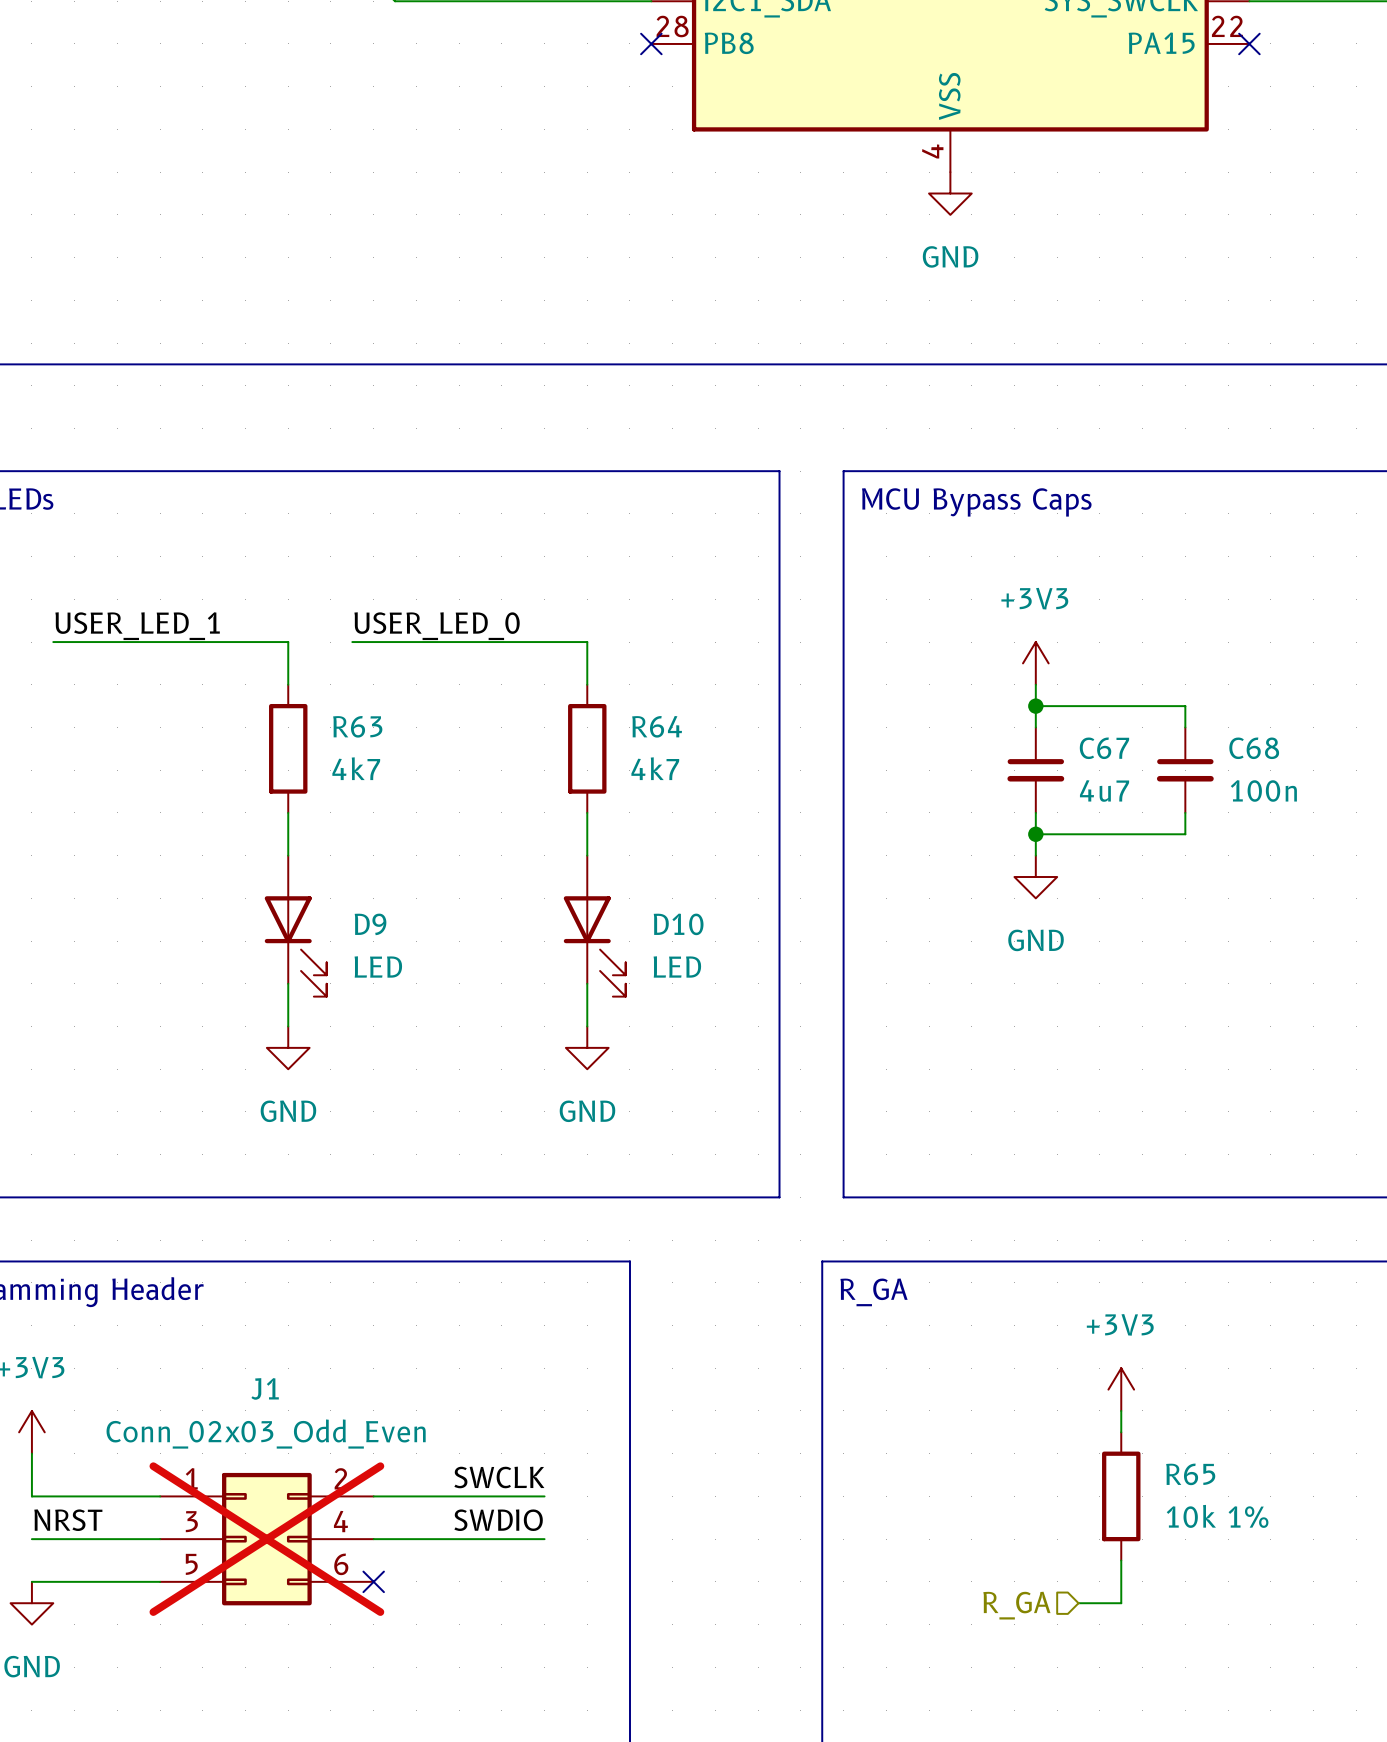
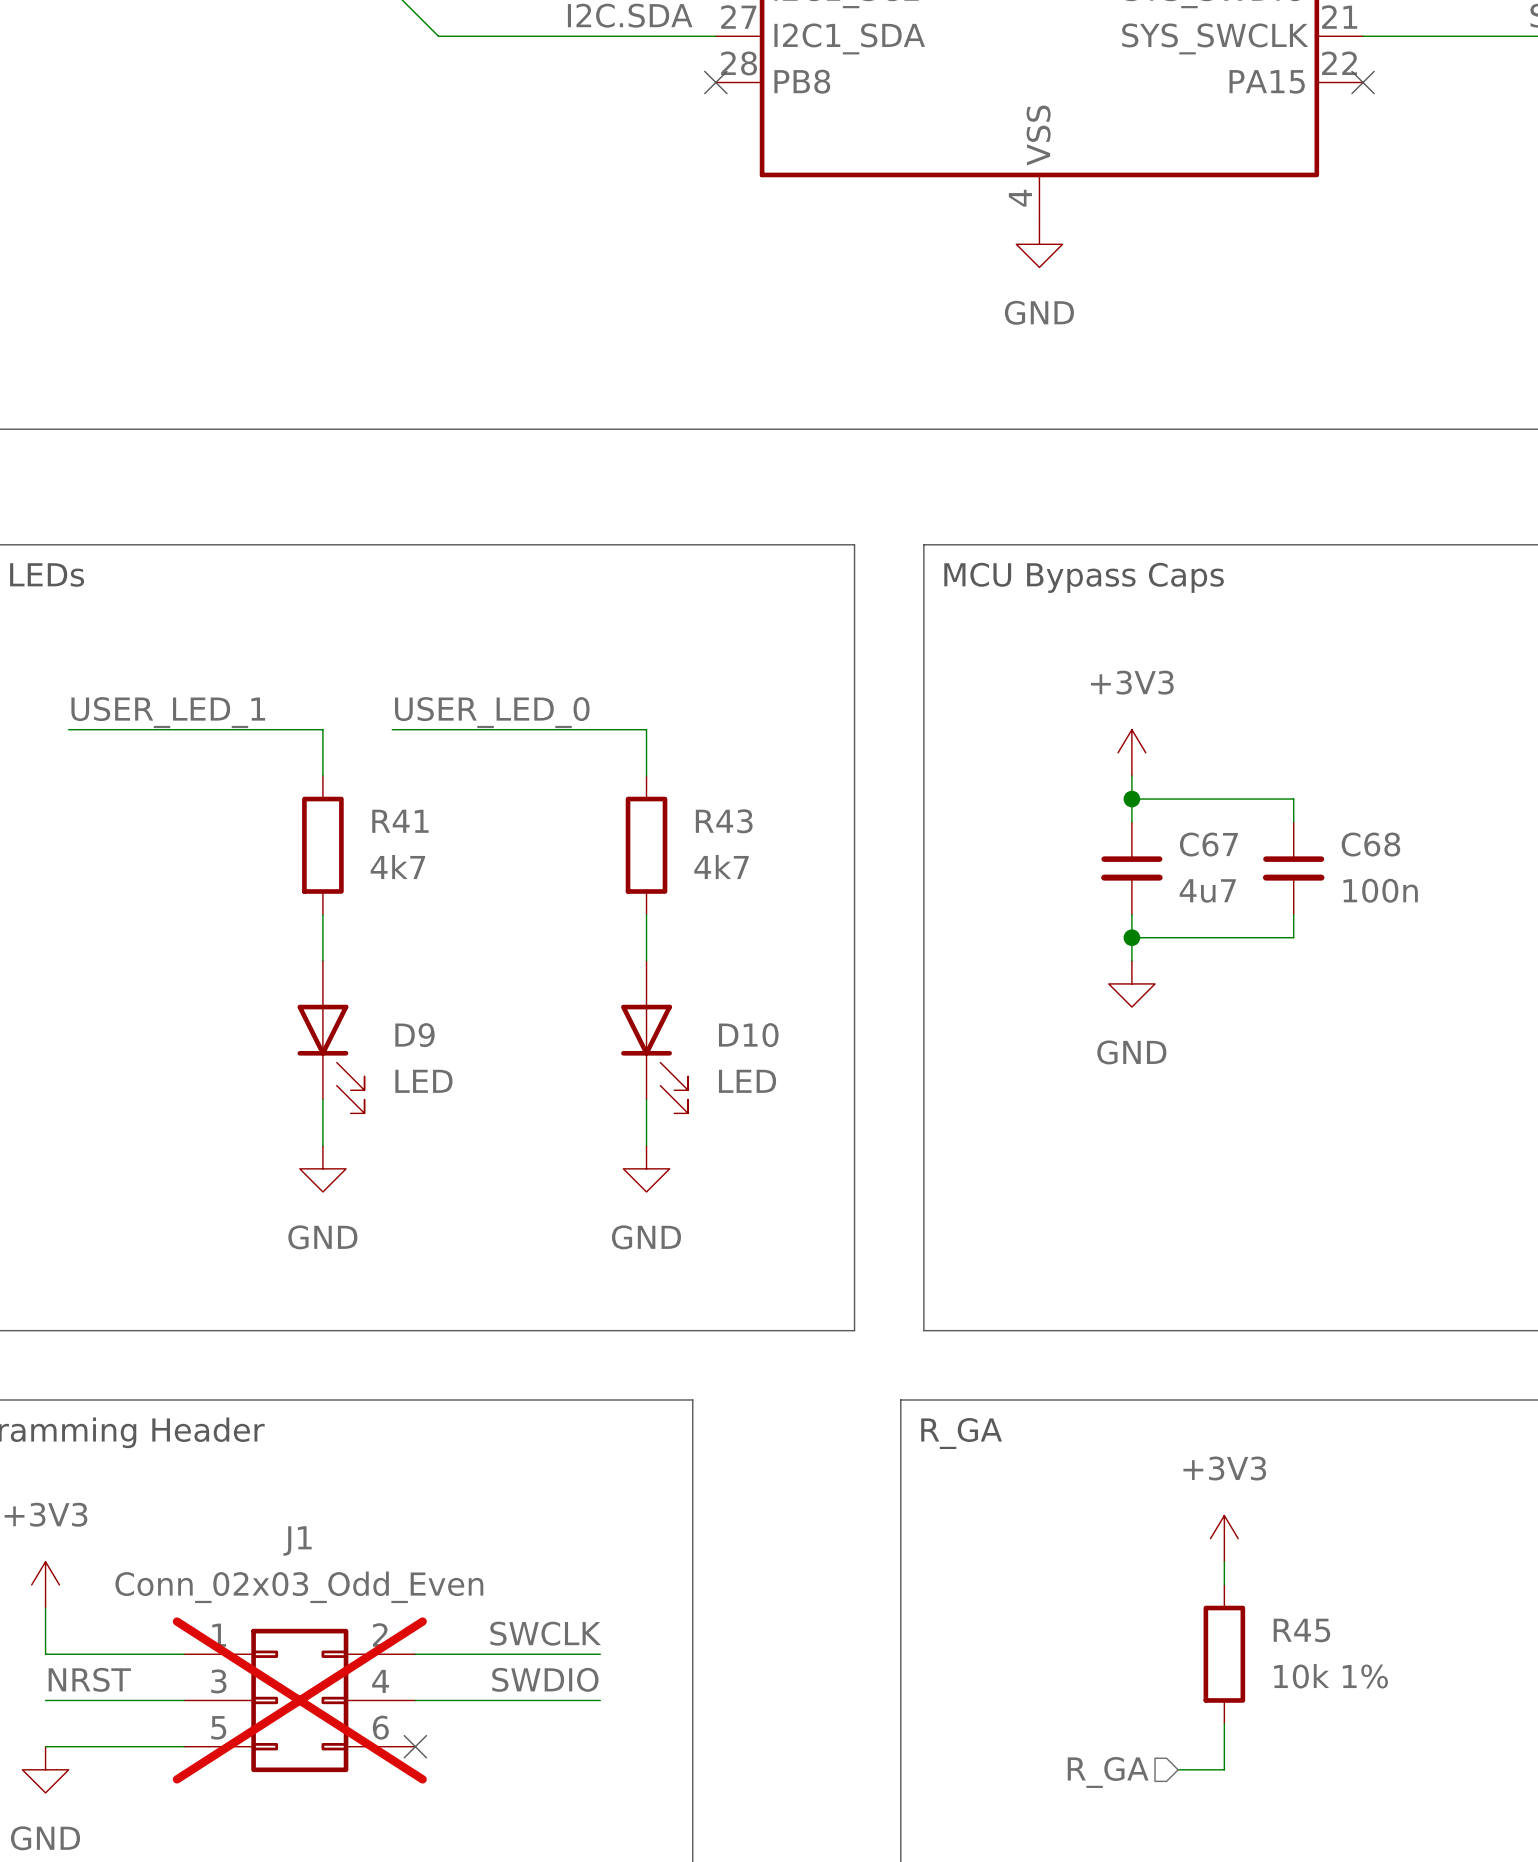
R63 name: R63 (357, 726) -> R41 (400, 821)
R64 name: R64 (657, 726) -> R43 (724, 821)
R65 name: R65 (1190, 1474) -> R45 (1301, 1630)

